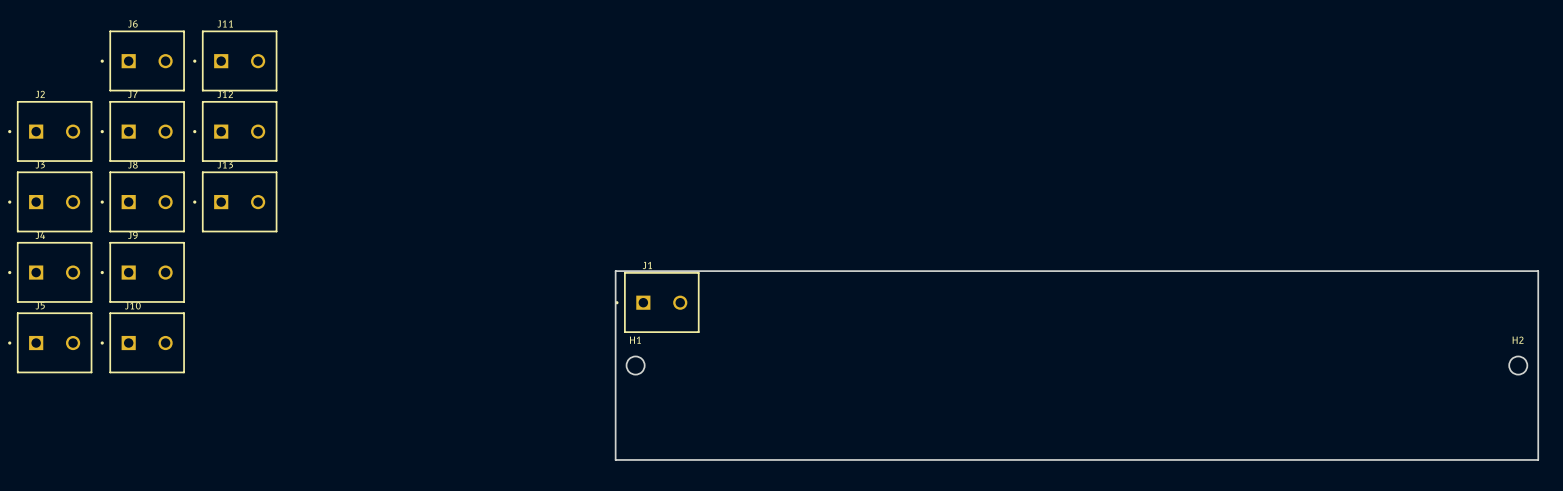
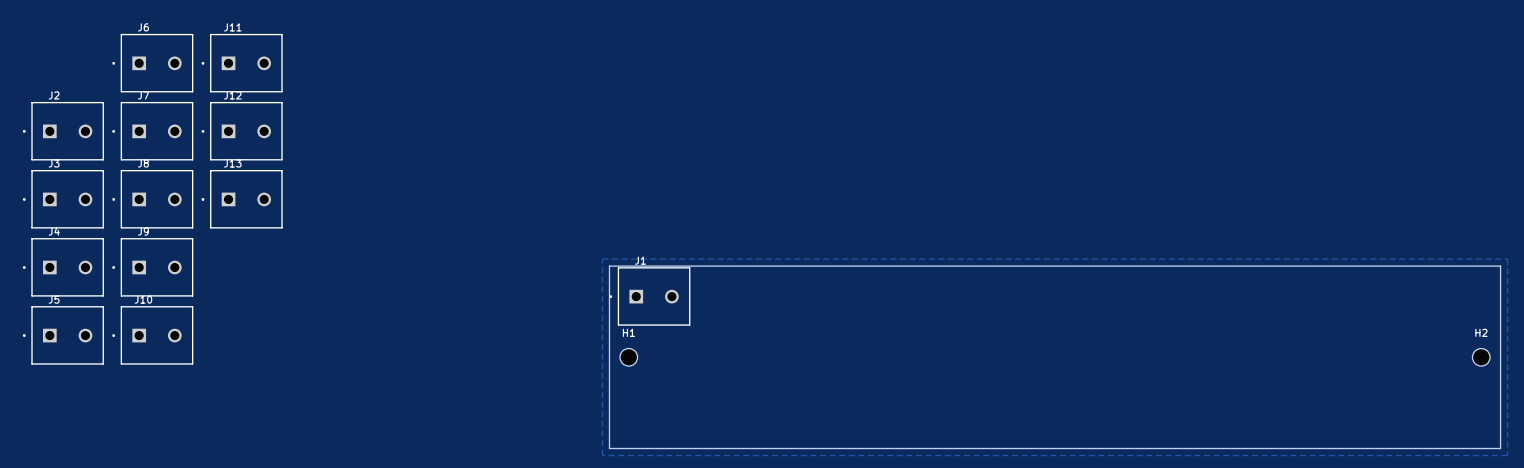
zone outline: none -> (602, 259) (1507, 259) (1507, 455) (602, 455) (602, 259)

